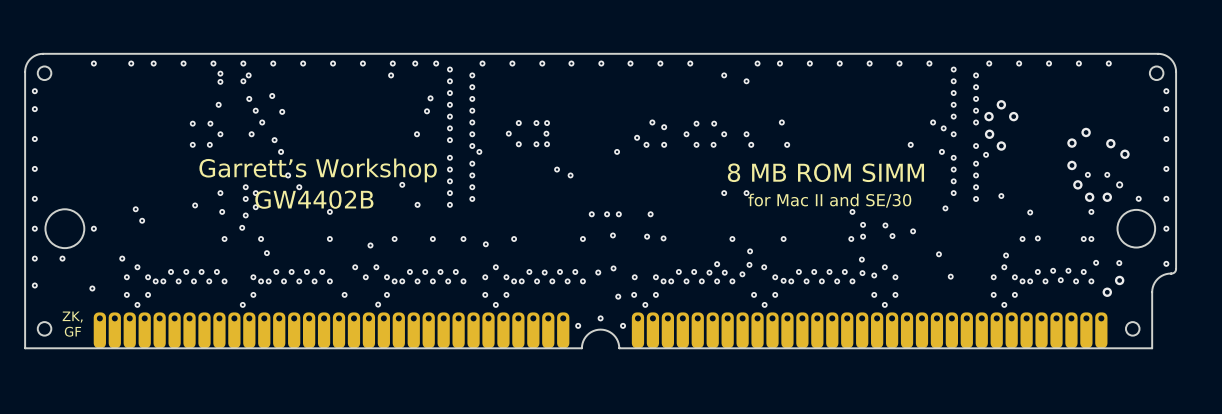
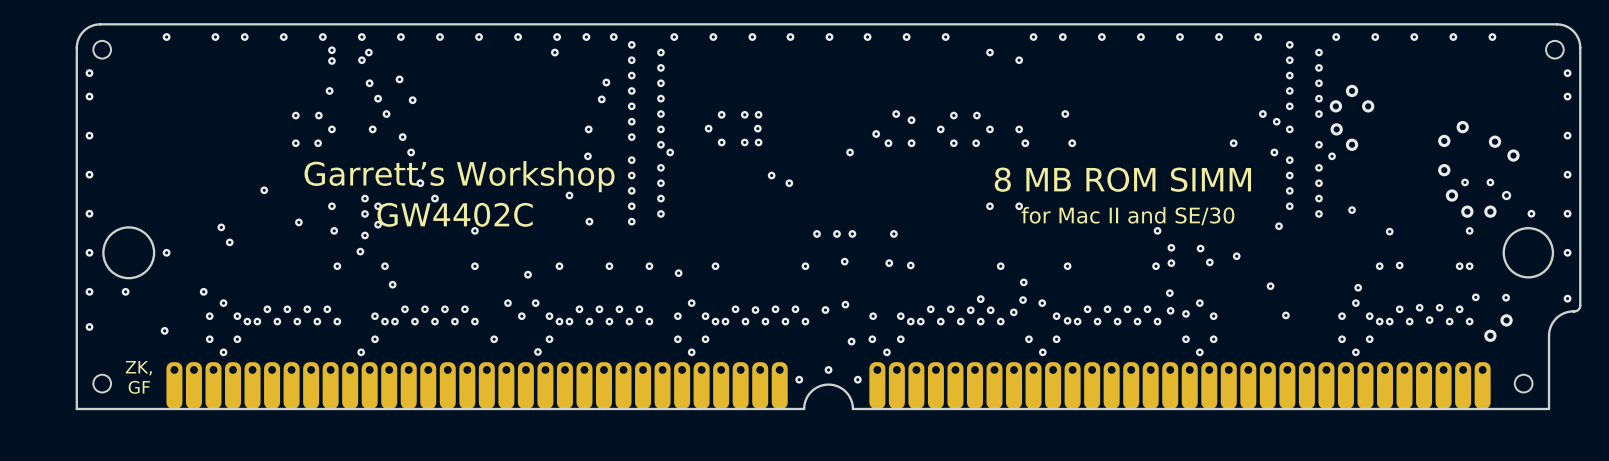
via: none -> (587, 156)
via: none -> (264, 190)
text: 4402B (335, 199) -> 4402C (483, 214)

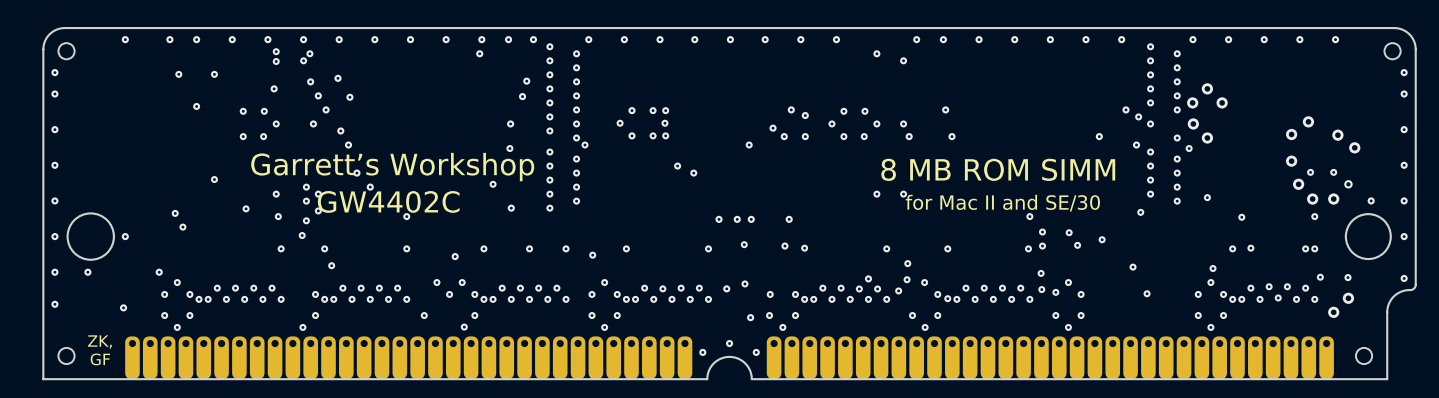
via: none -> (178, 74)
via: none -> (214, 74)
via: none -> (196, 106)

